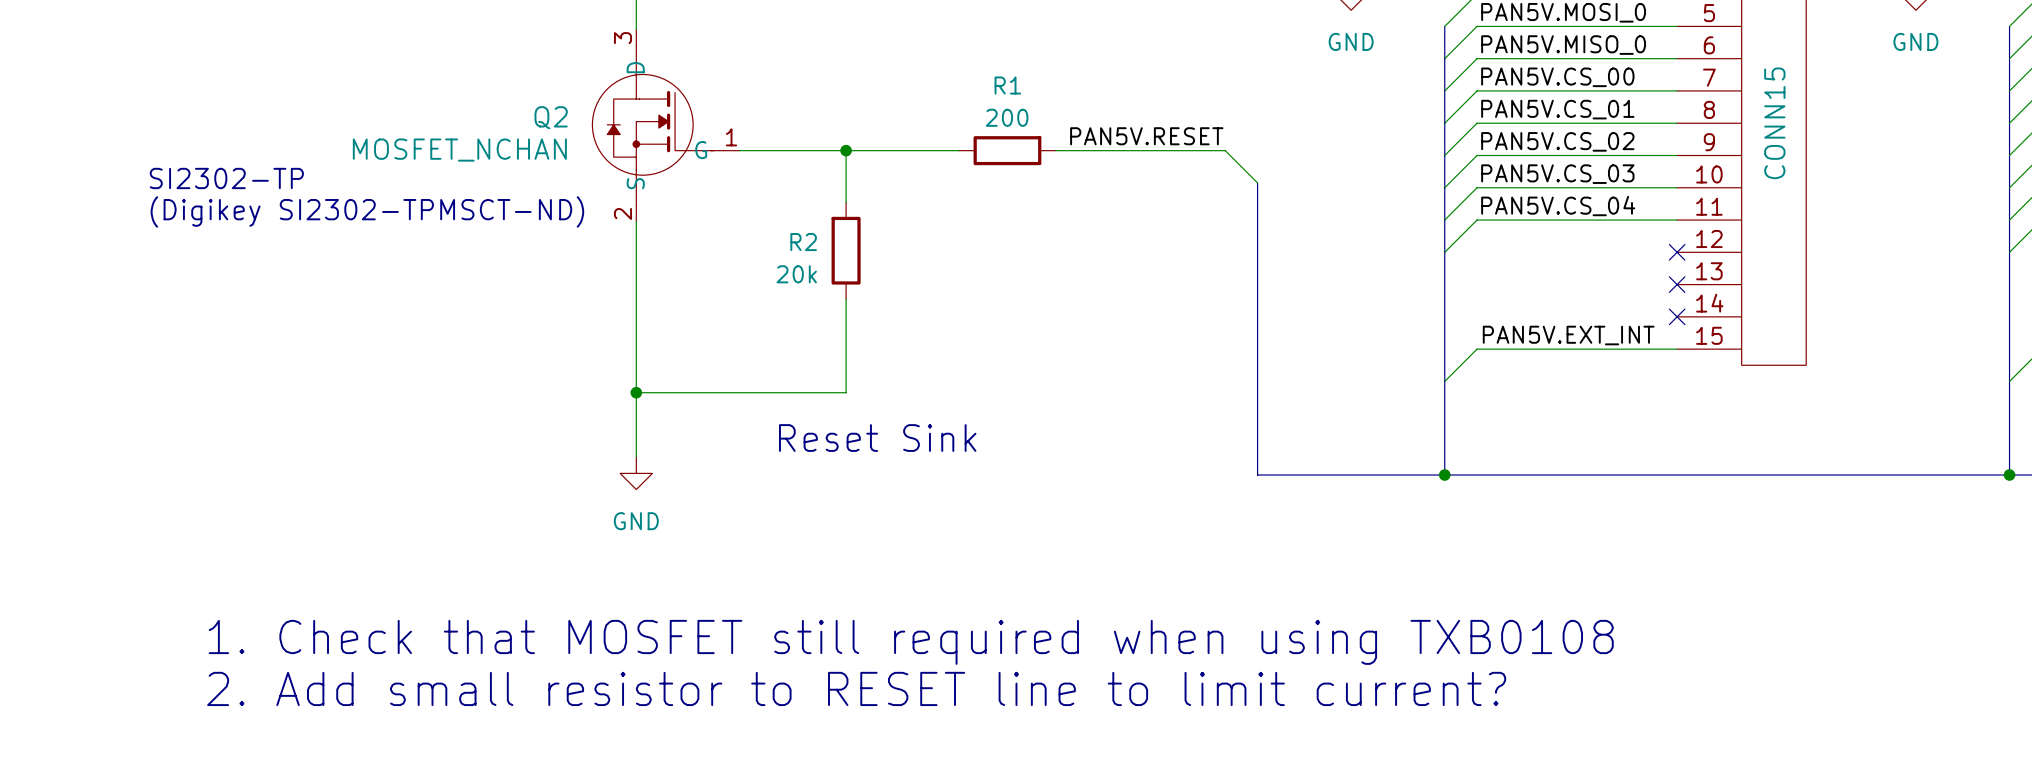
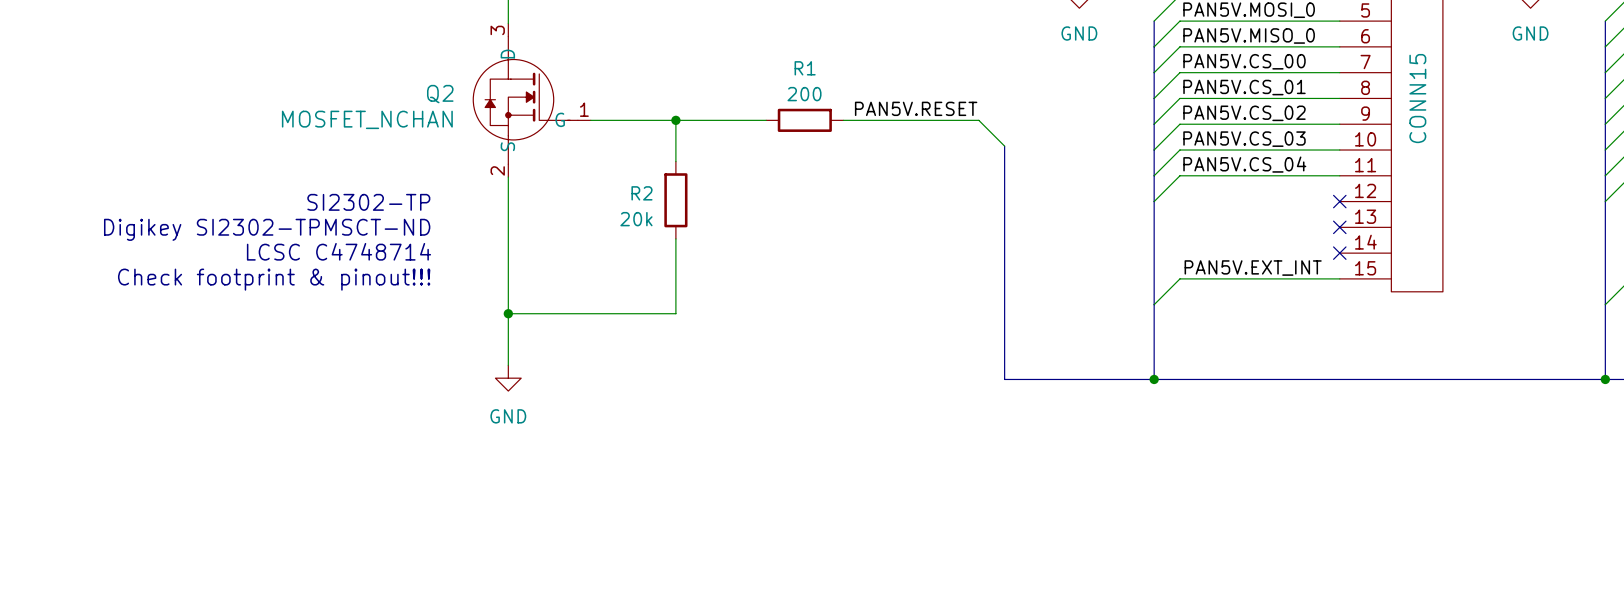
text: SI2302-TP (226, 178) -> none
text: (Digikey SI2302-TPMSCT-ND) (367, 211) -> none
text: none -> SI2302-TP (368, 202)
text: none -> Digikey SI2302-TPMSCT-ND (267, 229)
text: none -> LCSC C4748714 (338, 251)
text: none -> Check footprint & pinout!!! (274, 279)
text: Reset Sink (877, 438) -> none
text: 1. Check that MOSFET still required when using TXB0108 (911, 642) -> none
text: 2. Add small resistor to RESET line to limit current? (856, 688) -> none

